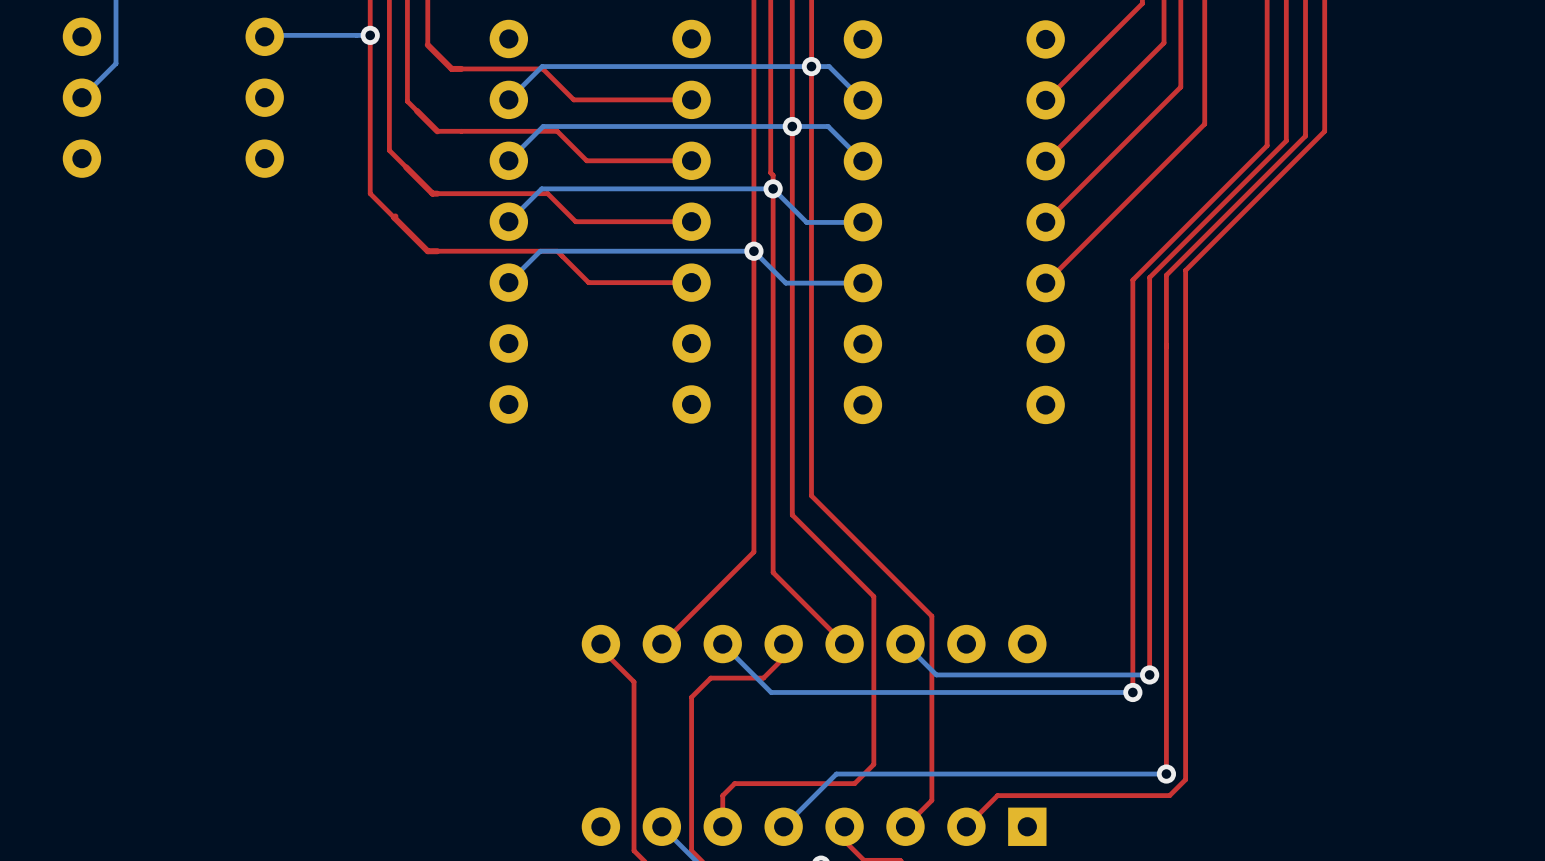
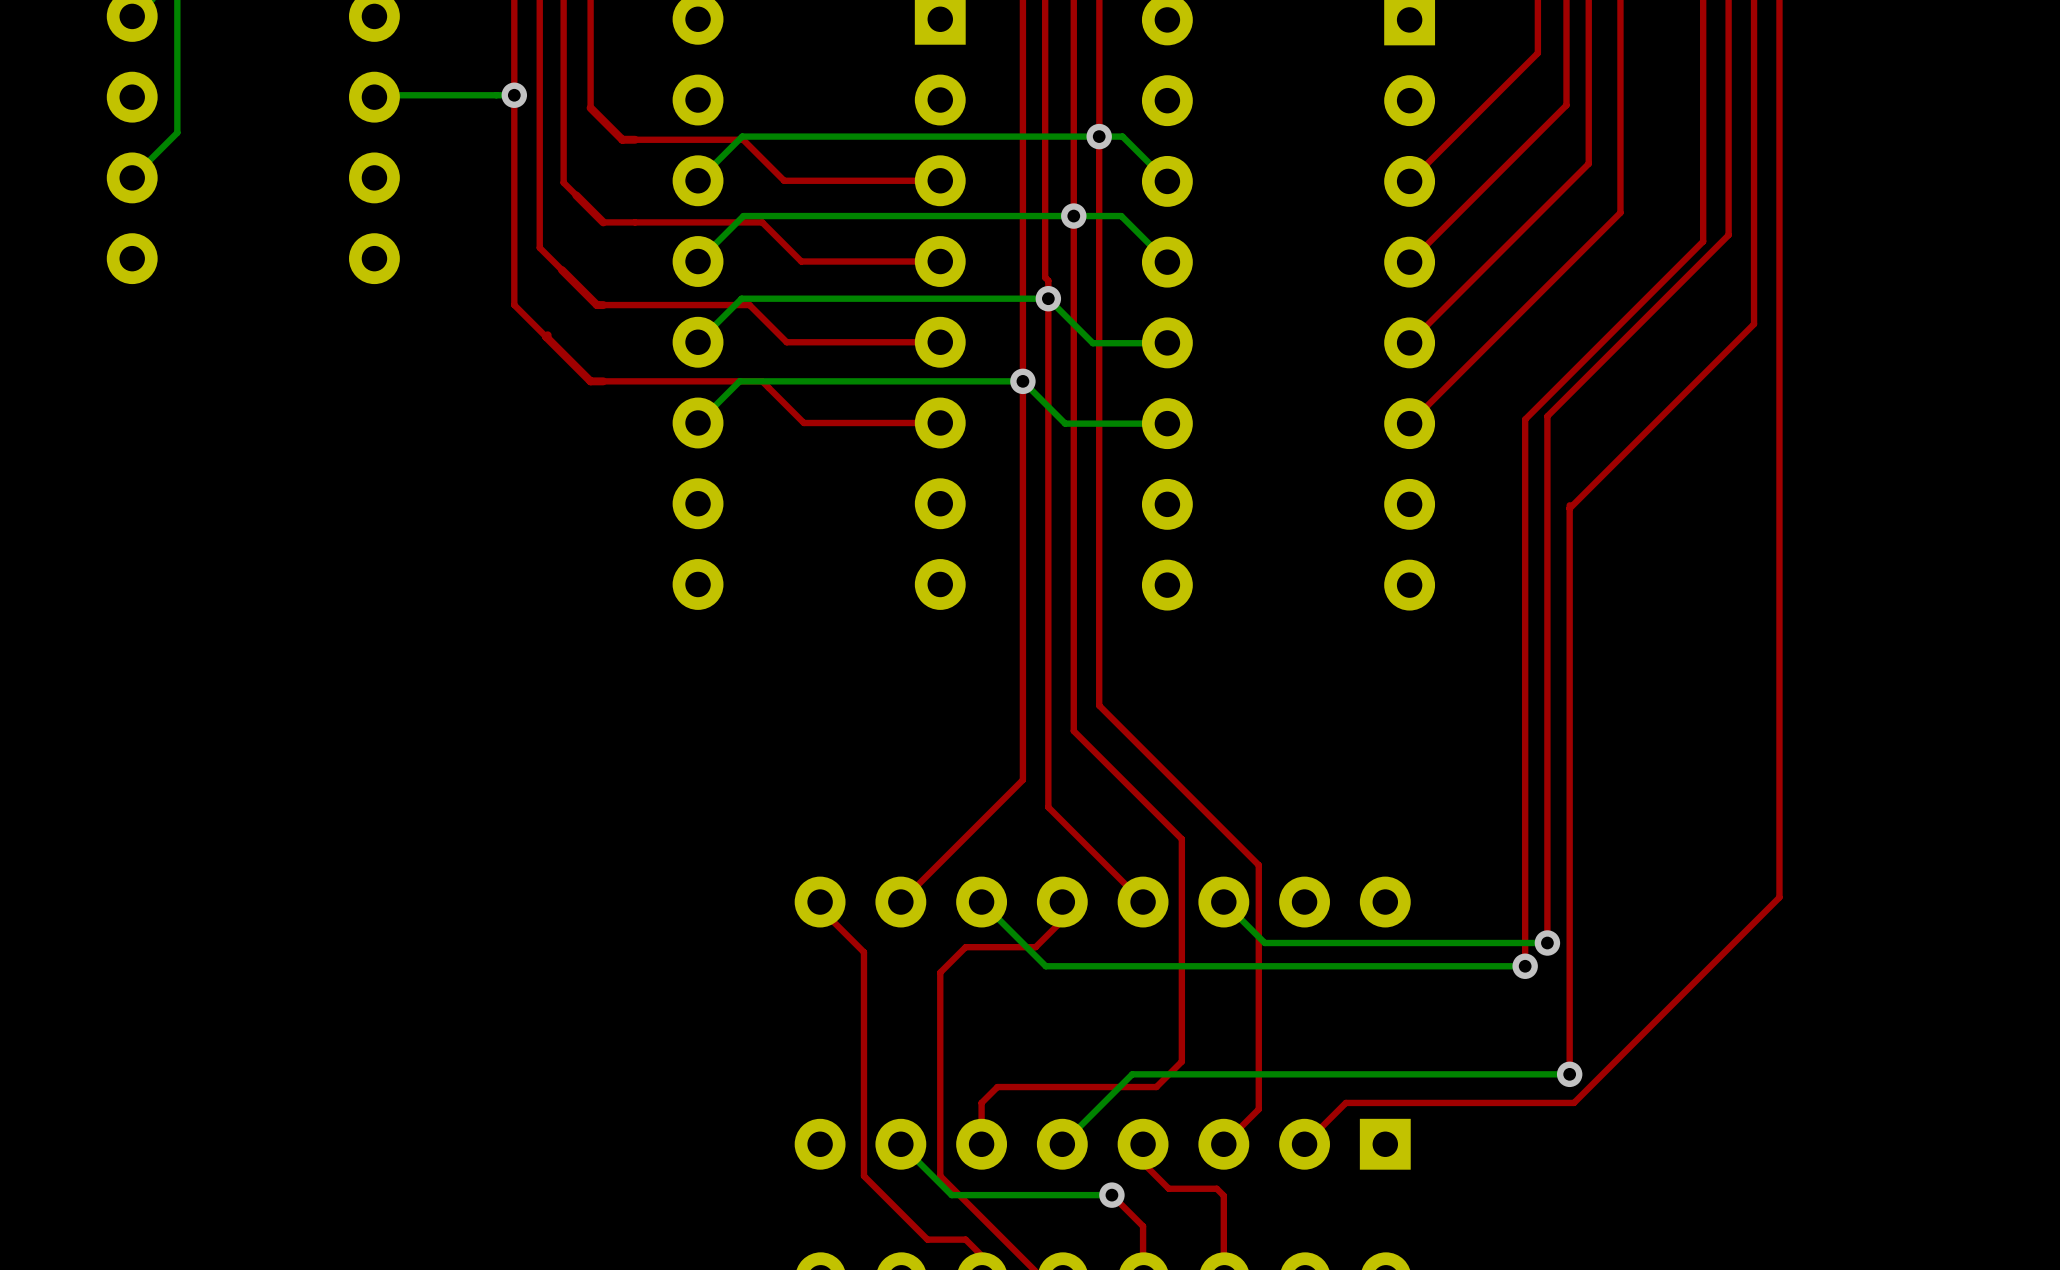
top track: (1324, 131) (1185, 270) (1185, 779) -> (1779, 222) (1779, 897) (1595, 1081)
top track: (1305, 136) (1166, 275) (1166, 344) -> (1754, 228) (1754, 324) (1569, 508)

